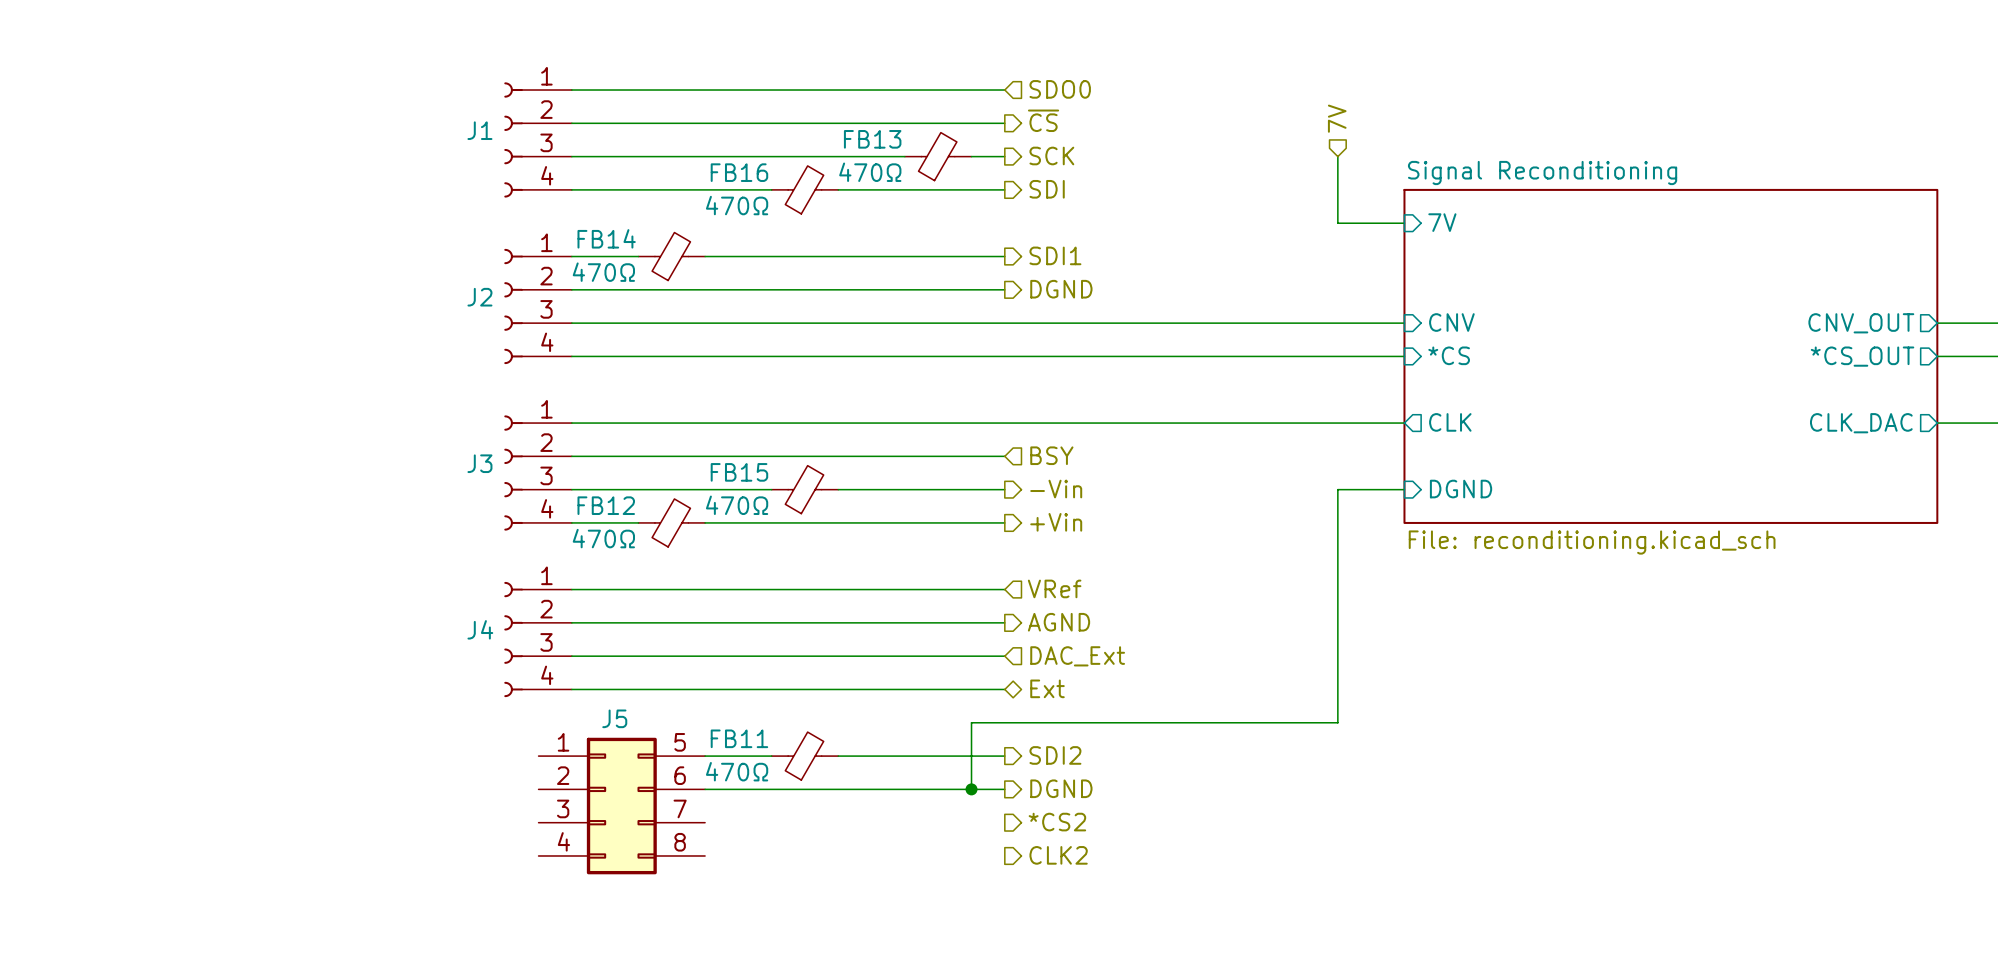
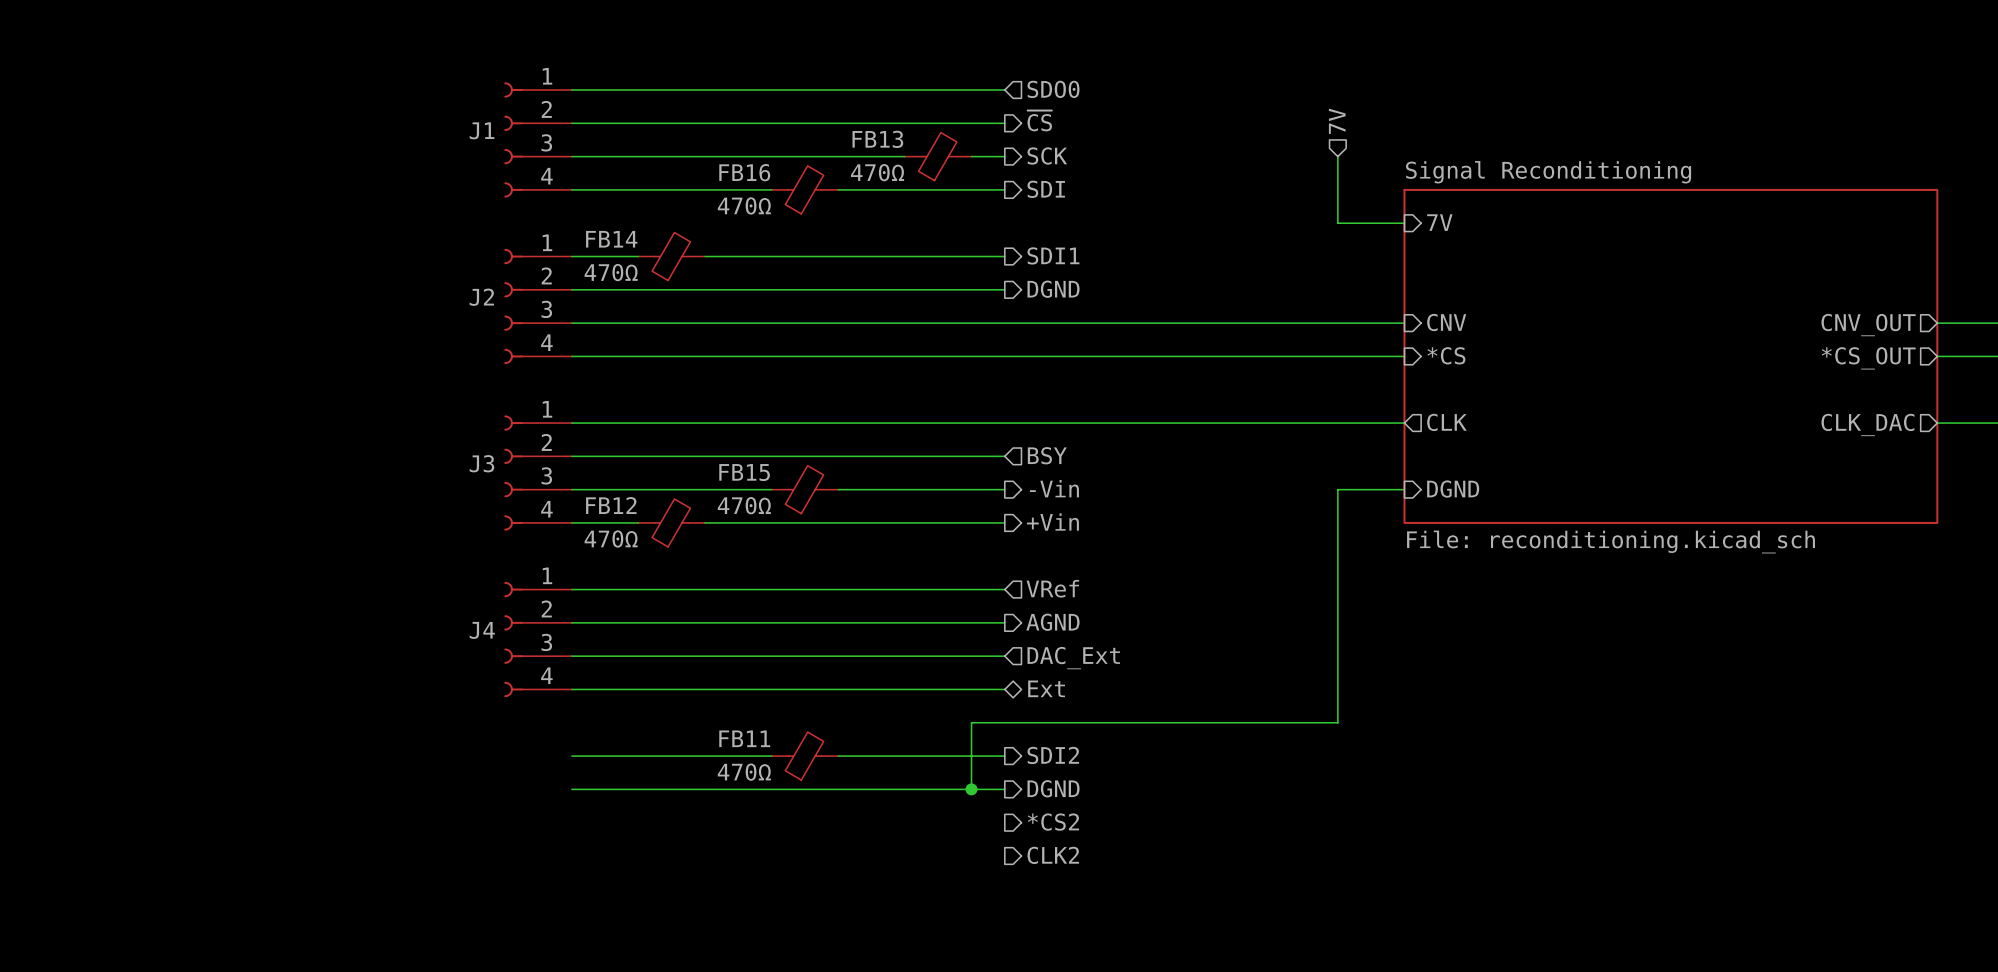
J5: (621, 806) -> none

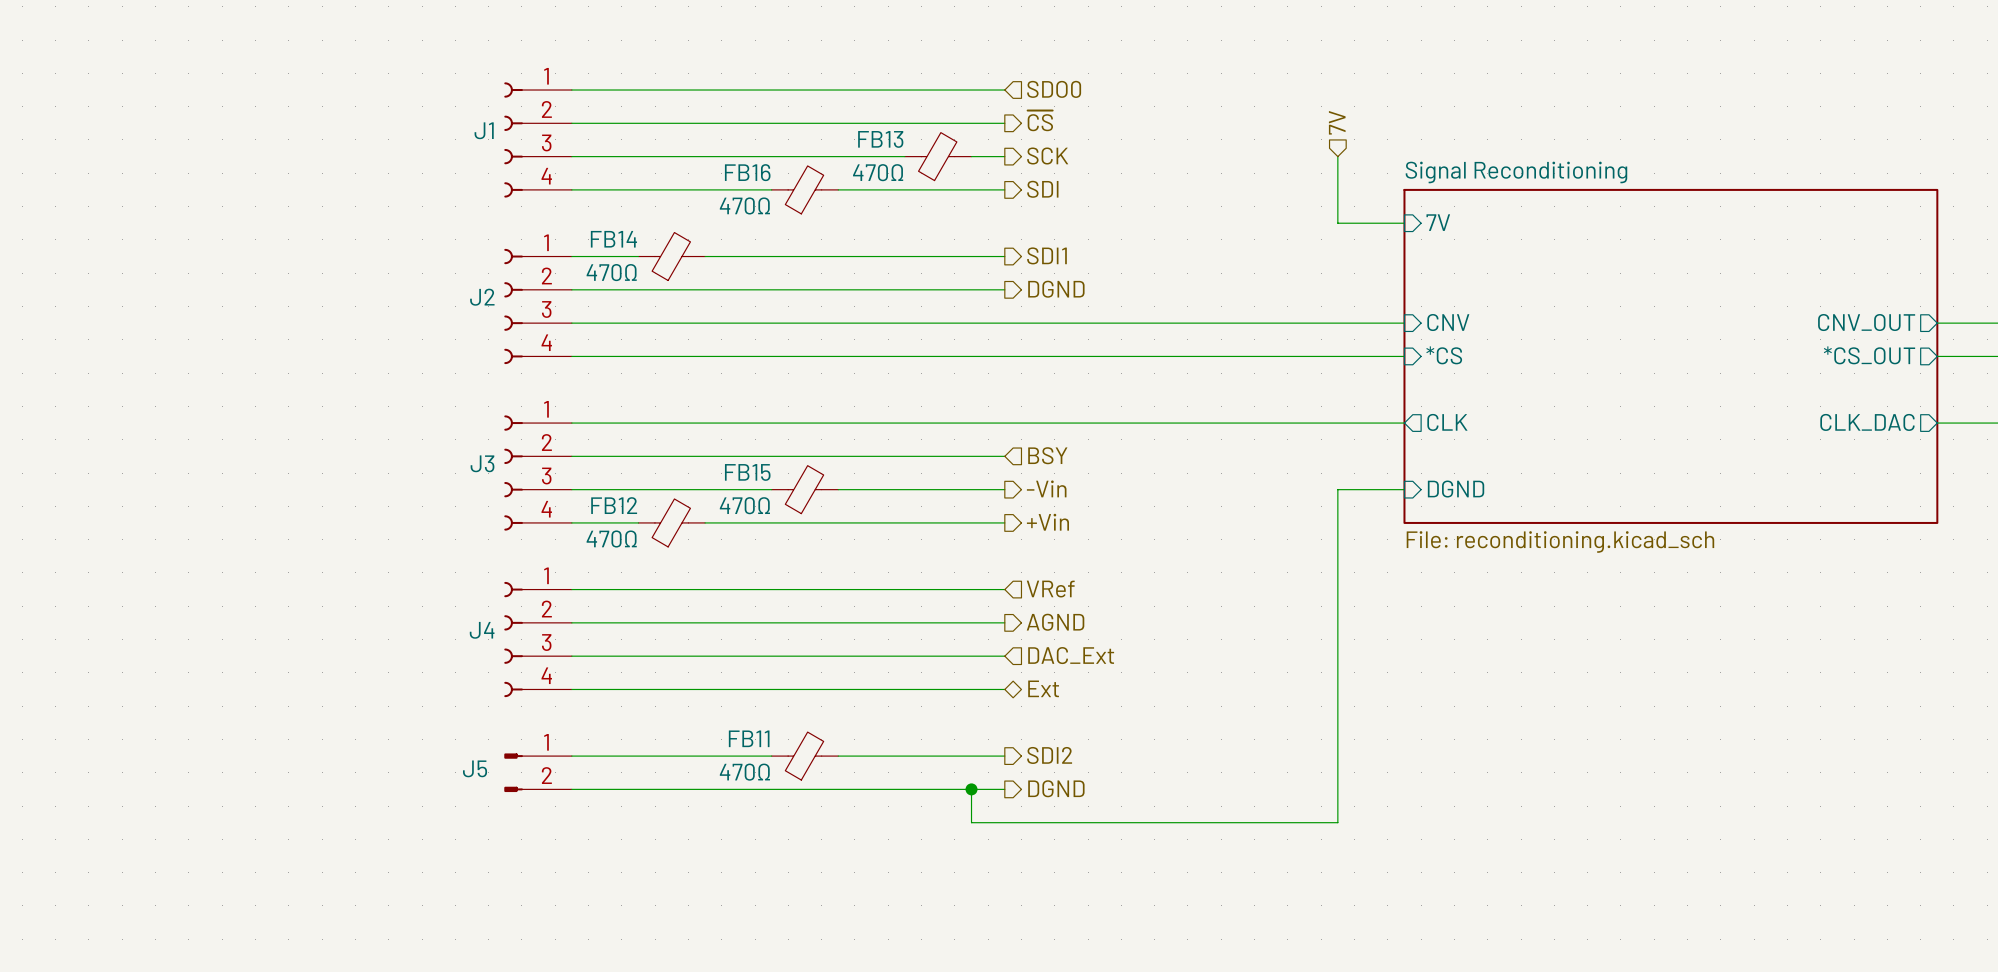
wire: (1337, 722) (971, 722) (971, 789) -> (1337, 722) (1337, 822) (971, 822) (971, 789)
J5: none -> (538, 772)
hierarchical label: *CS2 (1053, 822) -> none
hierarchical label: CLK2 (1053, 855) -> none

